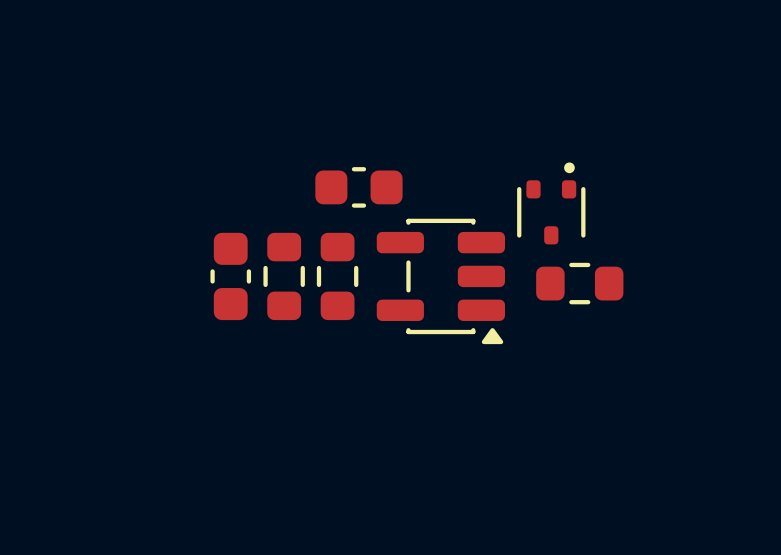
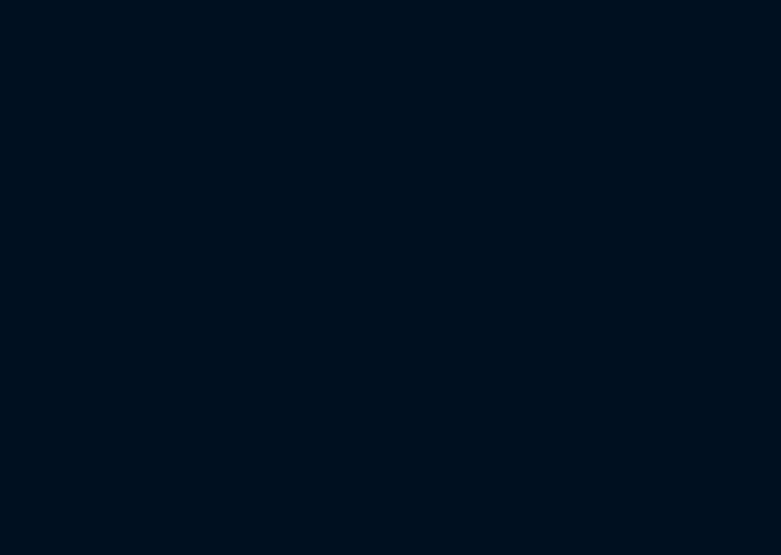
part: (358, 187) -> none
part: (551, 203) -> none
part: (230, 276) -> none
part: (284, 276) -> none
part: (337, 276) -> none
part: (440, 281) -> none
part: (579, 283) -> none

